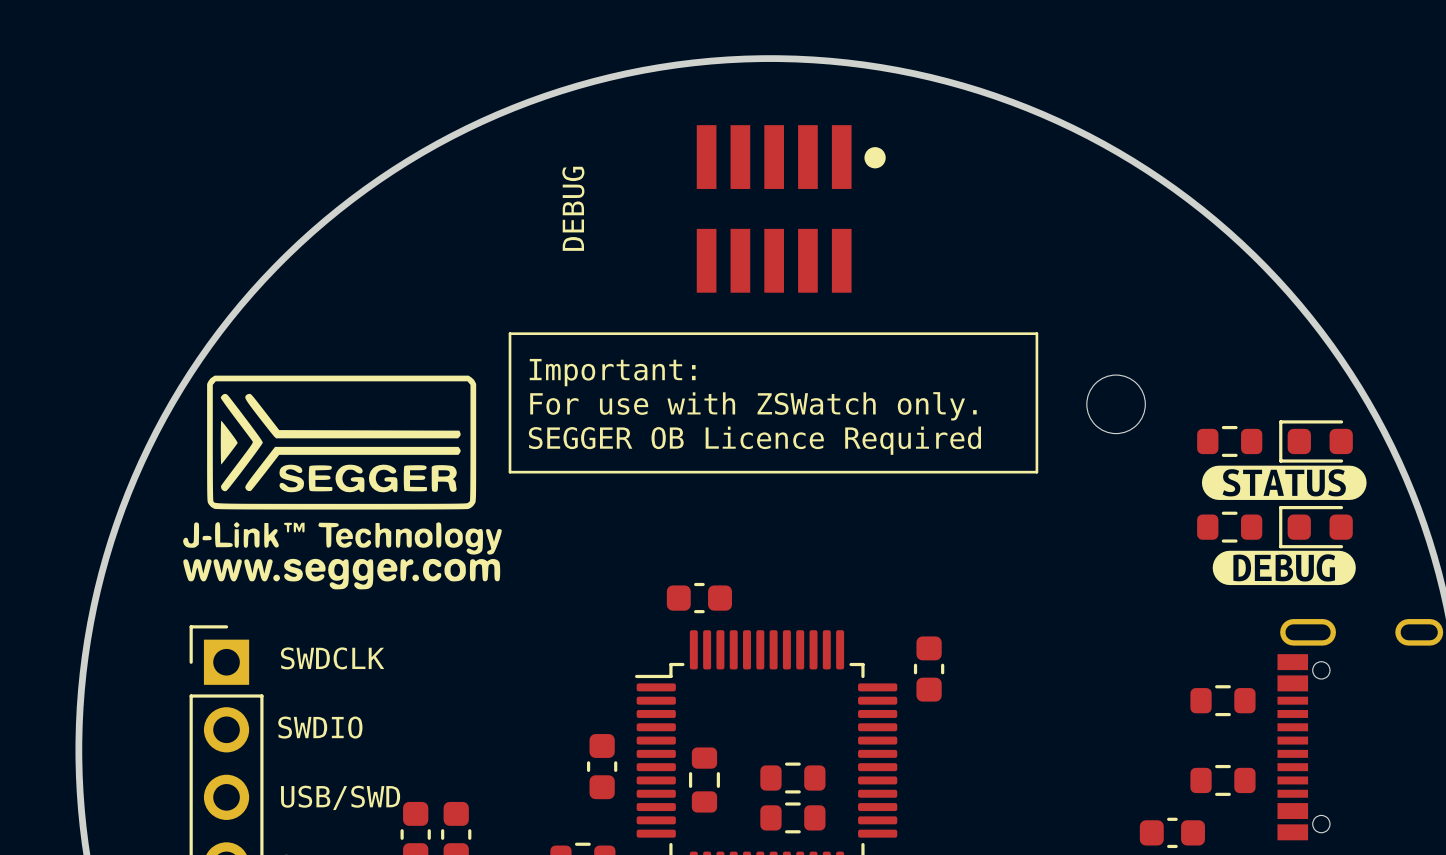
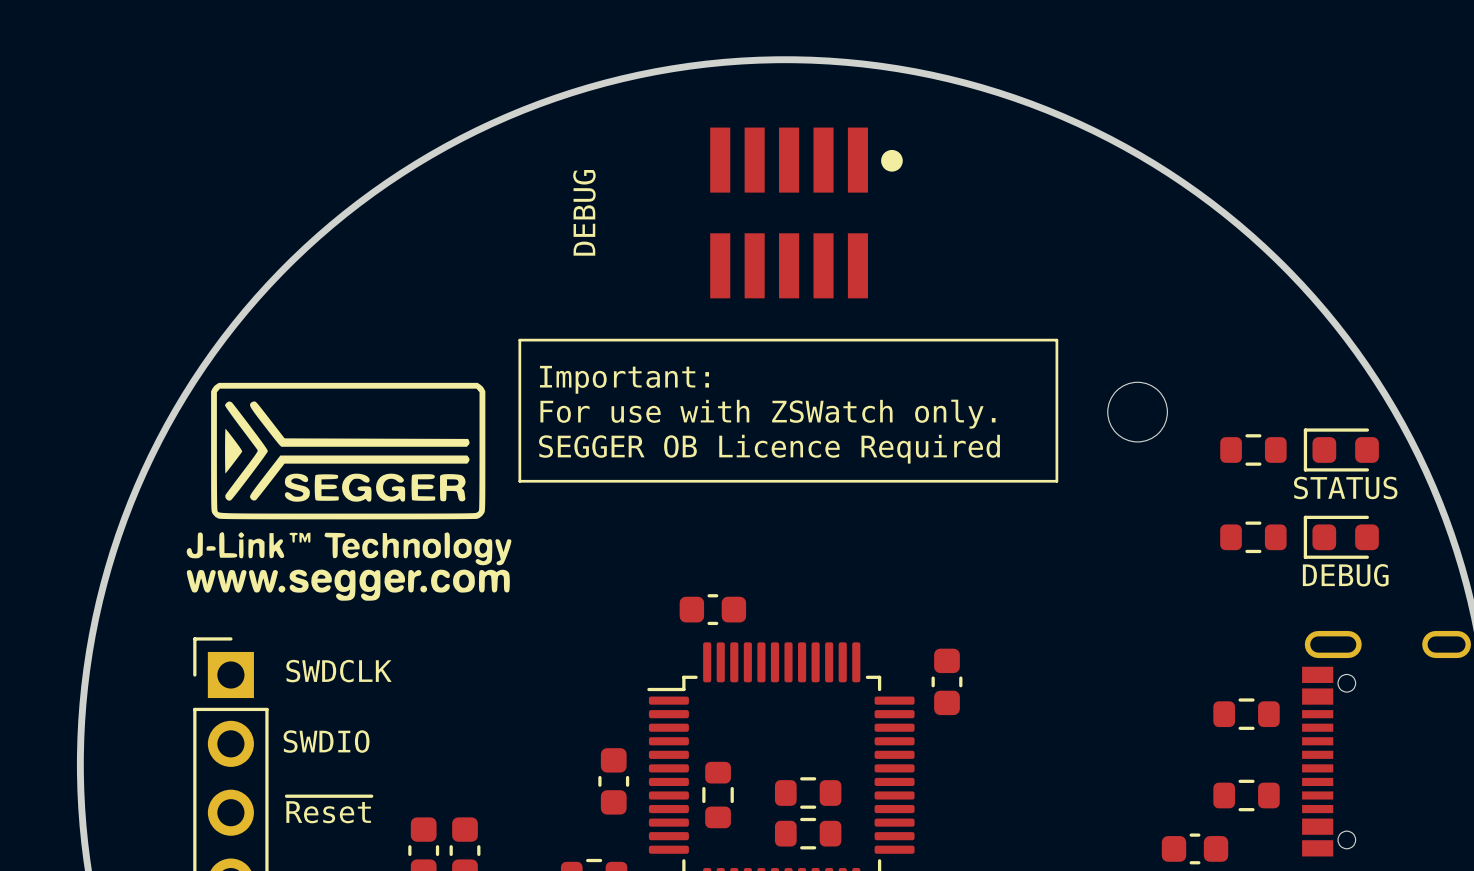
drawing: [1201, 465, 1367, 500] -> none
part value: none -> STATUS (1345, 487)
drawing: [1212, 550, 1356, 586] -> none
part value: none -> DEBUG (1345, 575)
text: USB/SWD (340, 797) -> ~{Reset} (329, 809)

